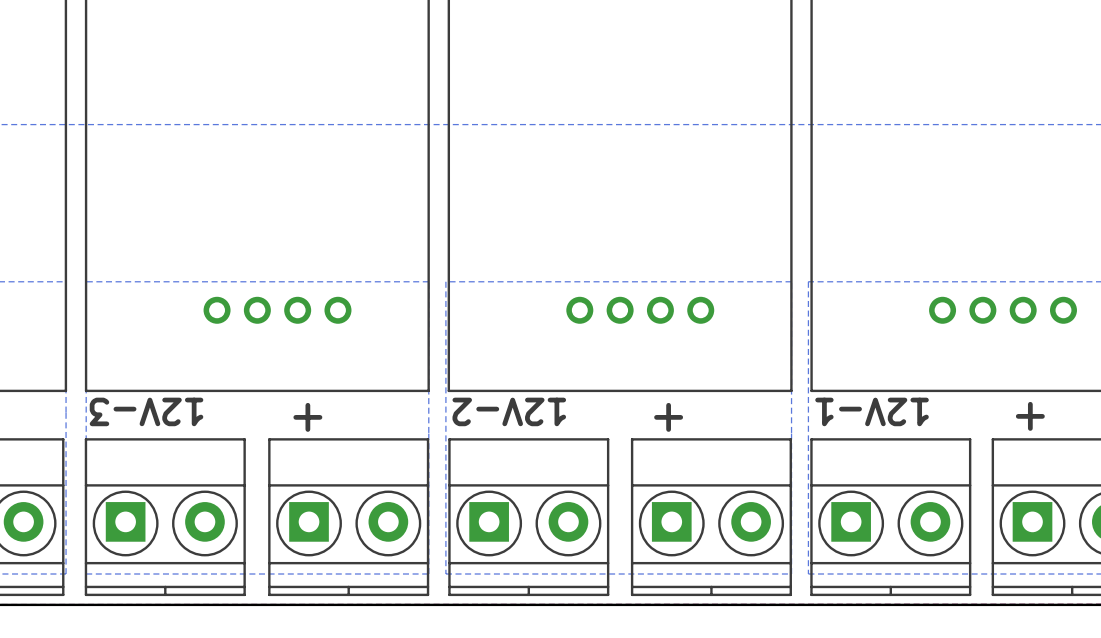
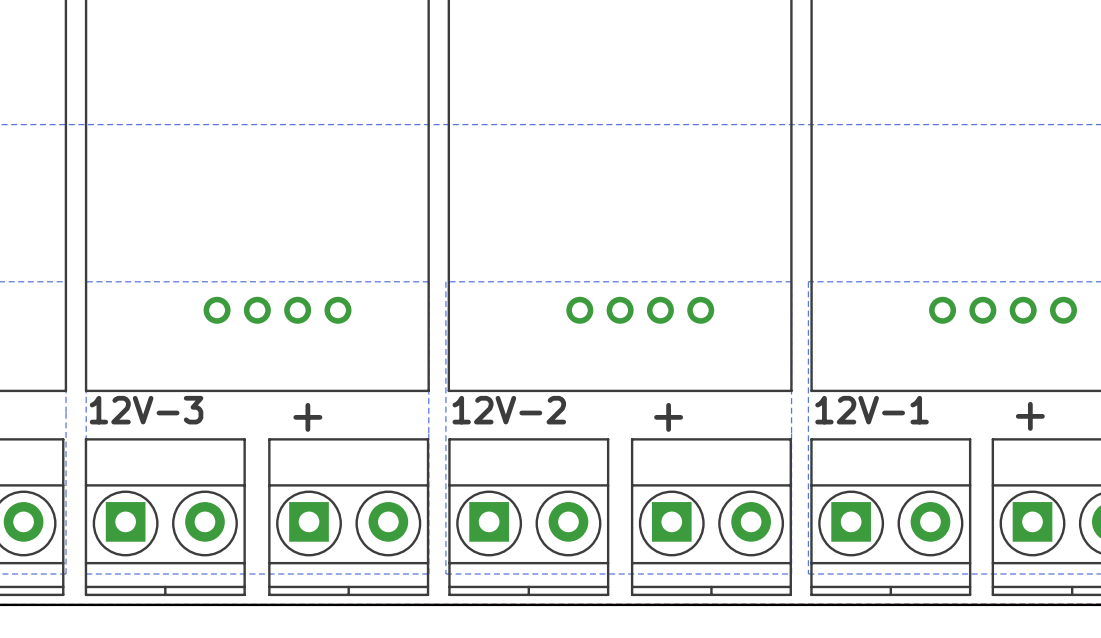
text rotation: 0° (146, 411) -> 180° (146, 410)
text rotation: 0° (509, 411) -> 180° (509, 410)
text rotation: 0° (872, 411) -> 180° (872, 410)

